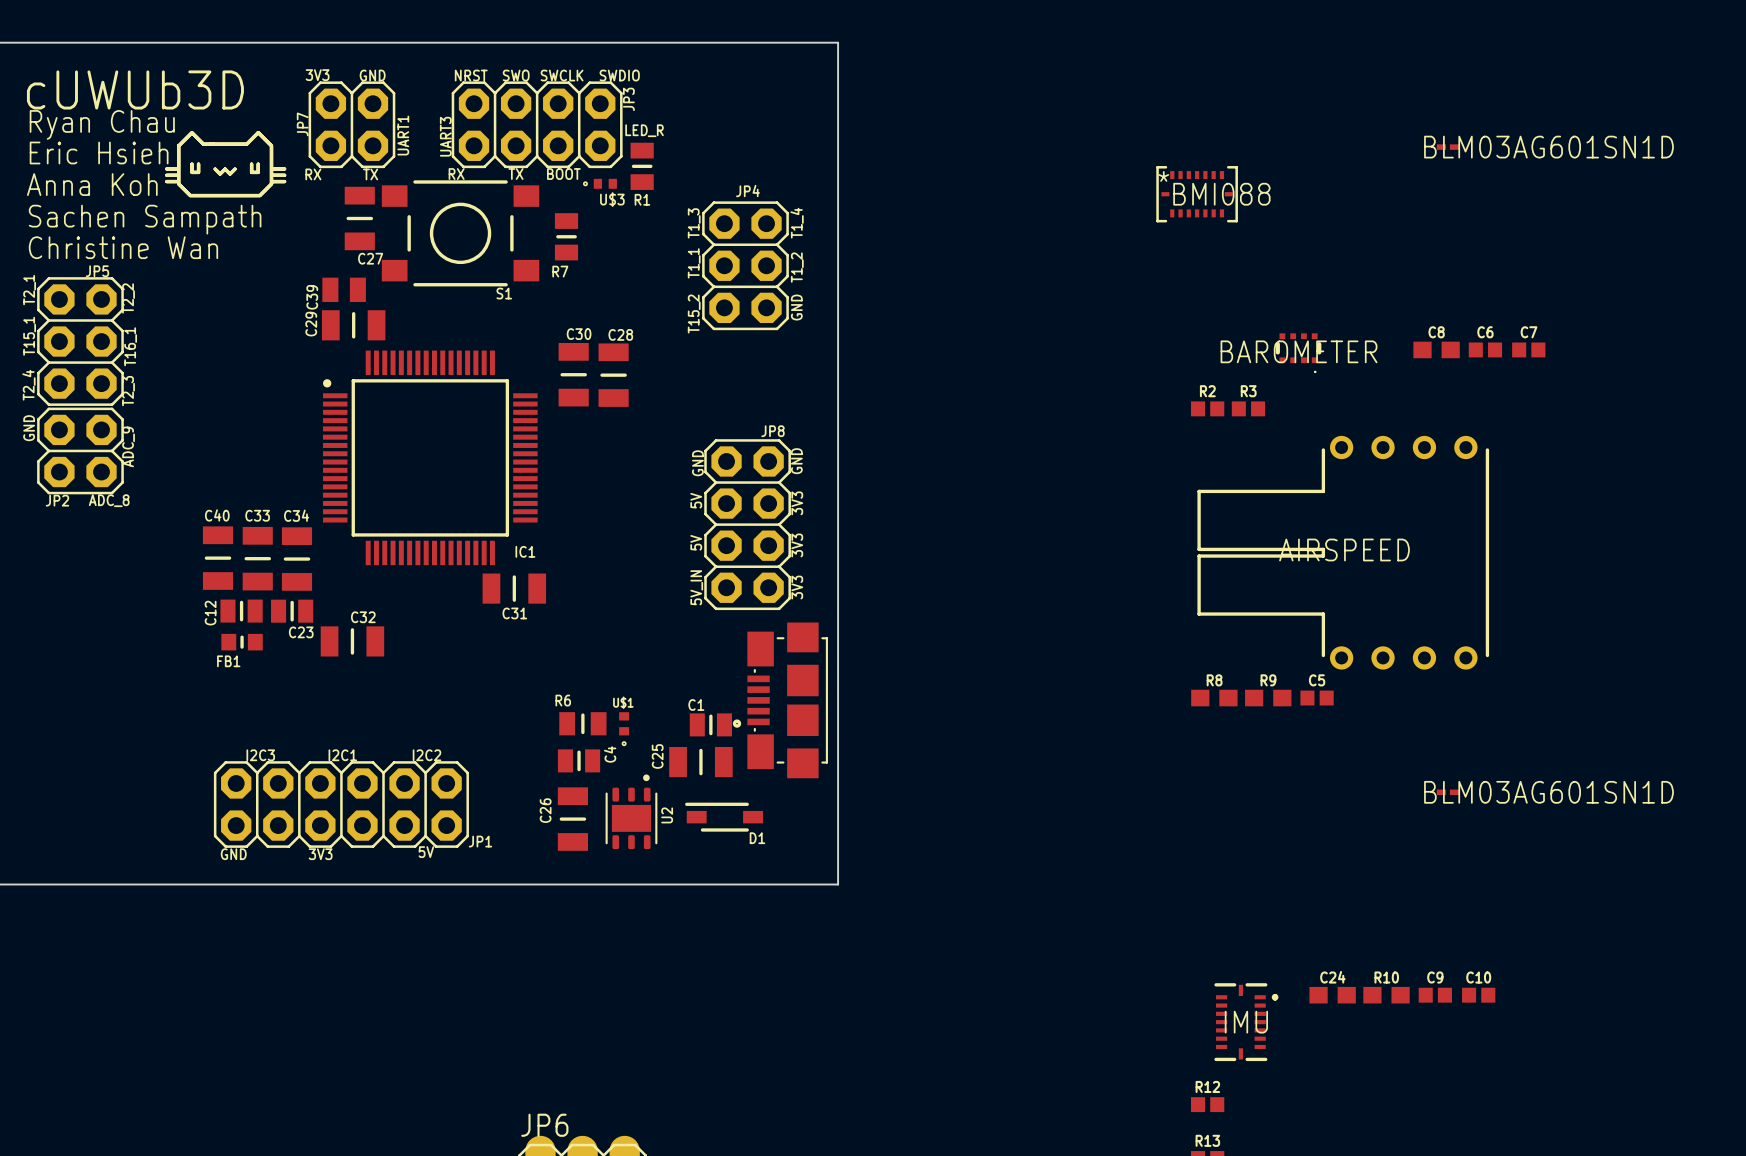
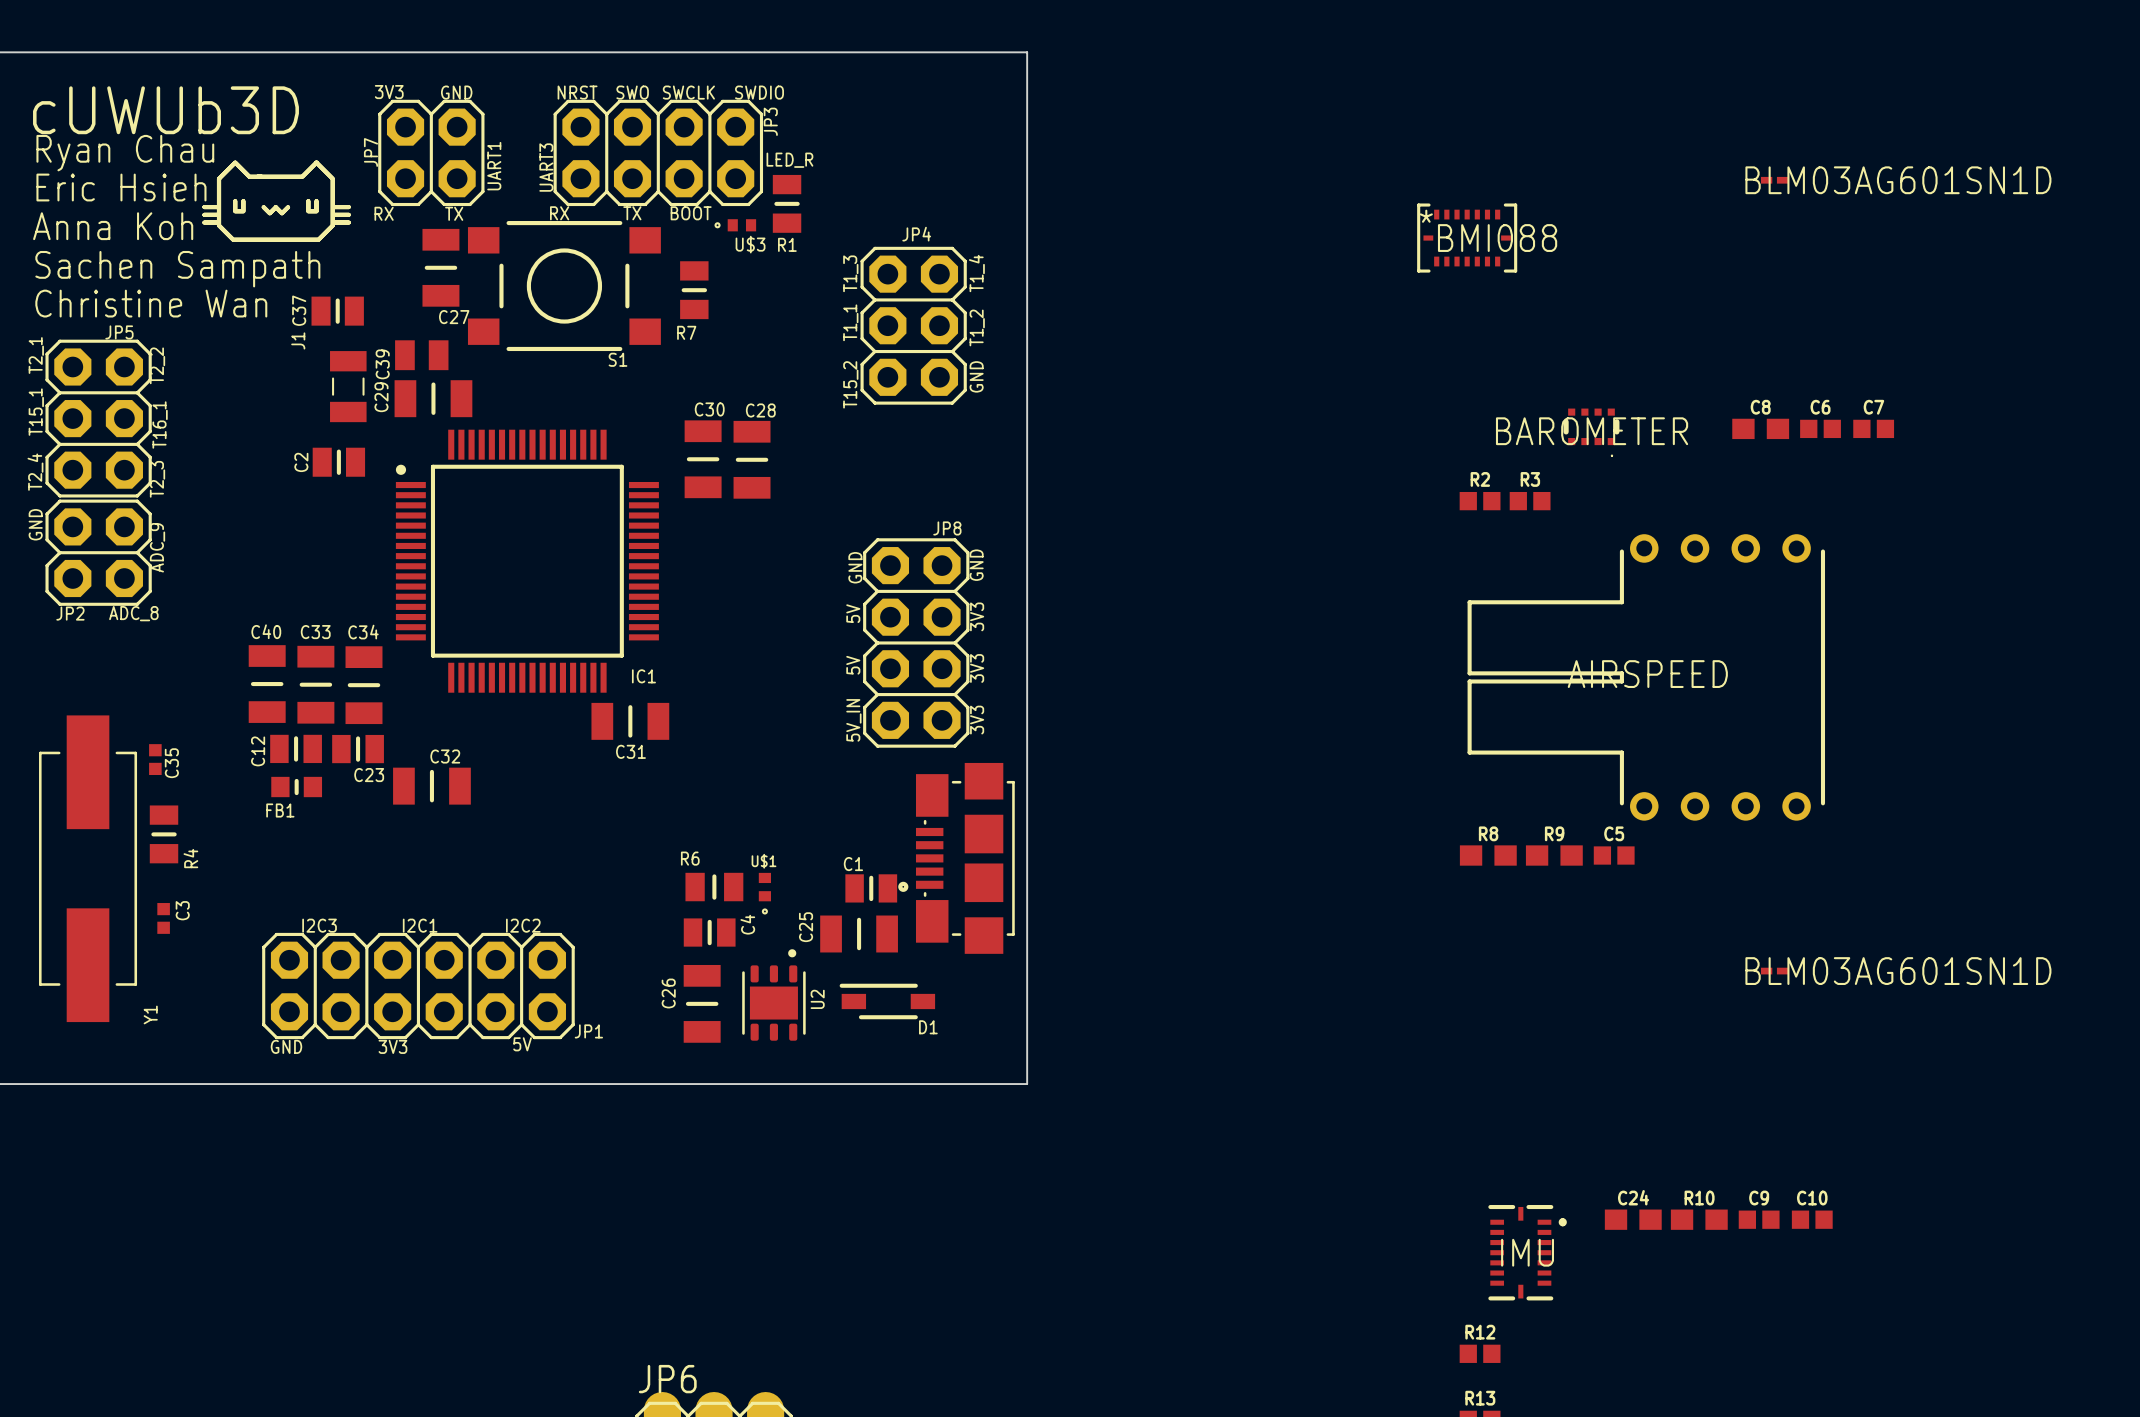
C37: none -> (337, 311)
J1: none -> (348, 386)
C2: none -> (338, 462)
C35: none -> (155, 759)
R4: none -> (164, 834)
Y1: none -> (88, 868)
C3: none -> (163, 918)

